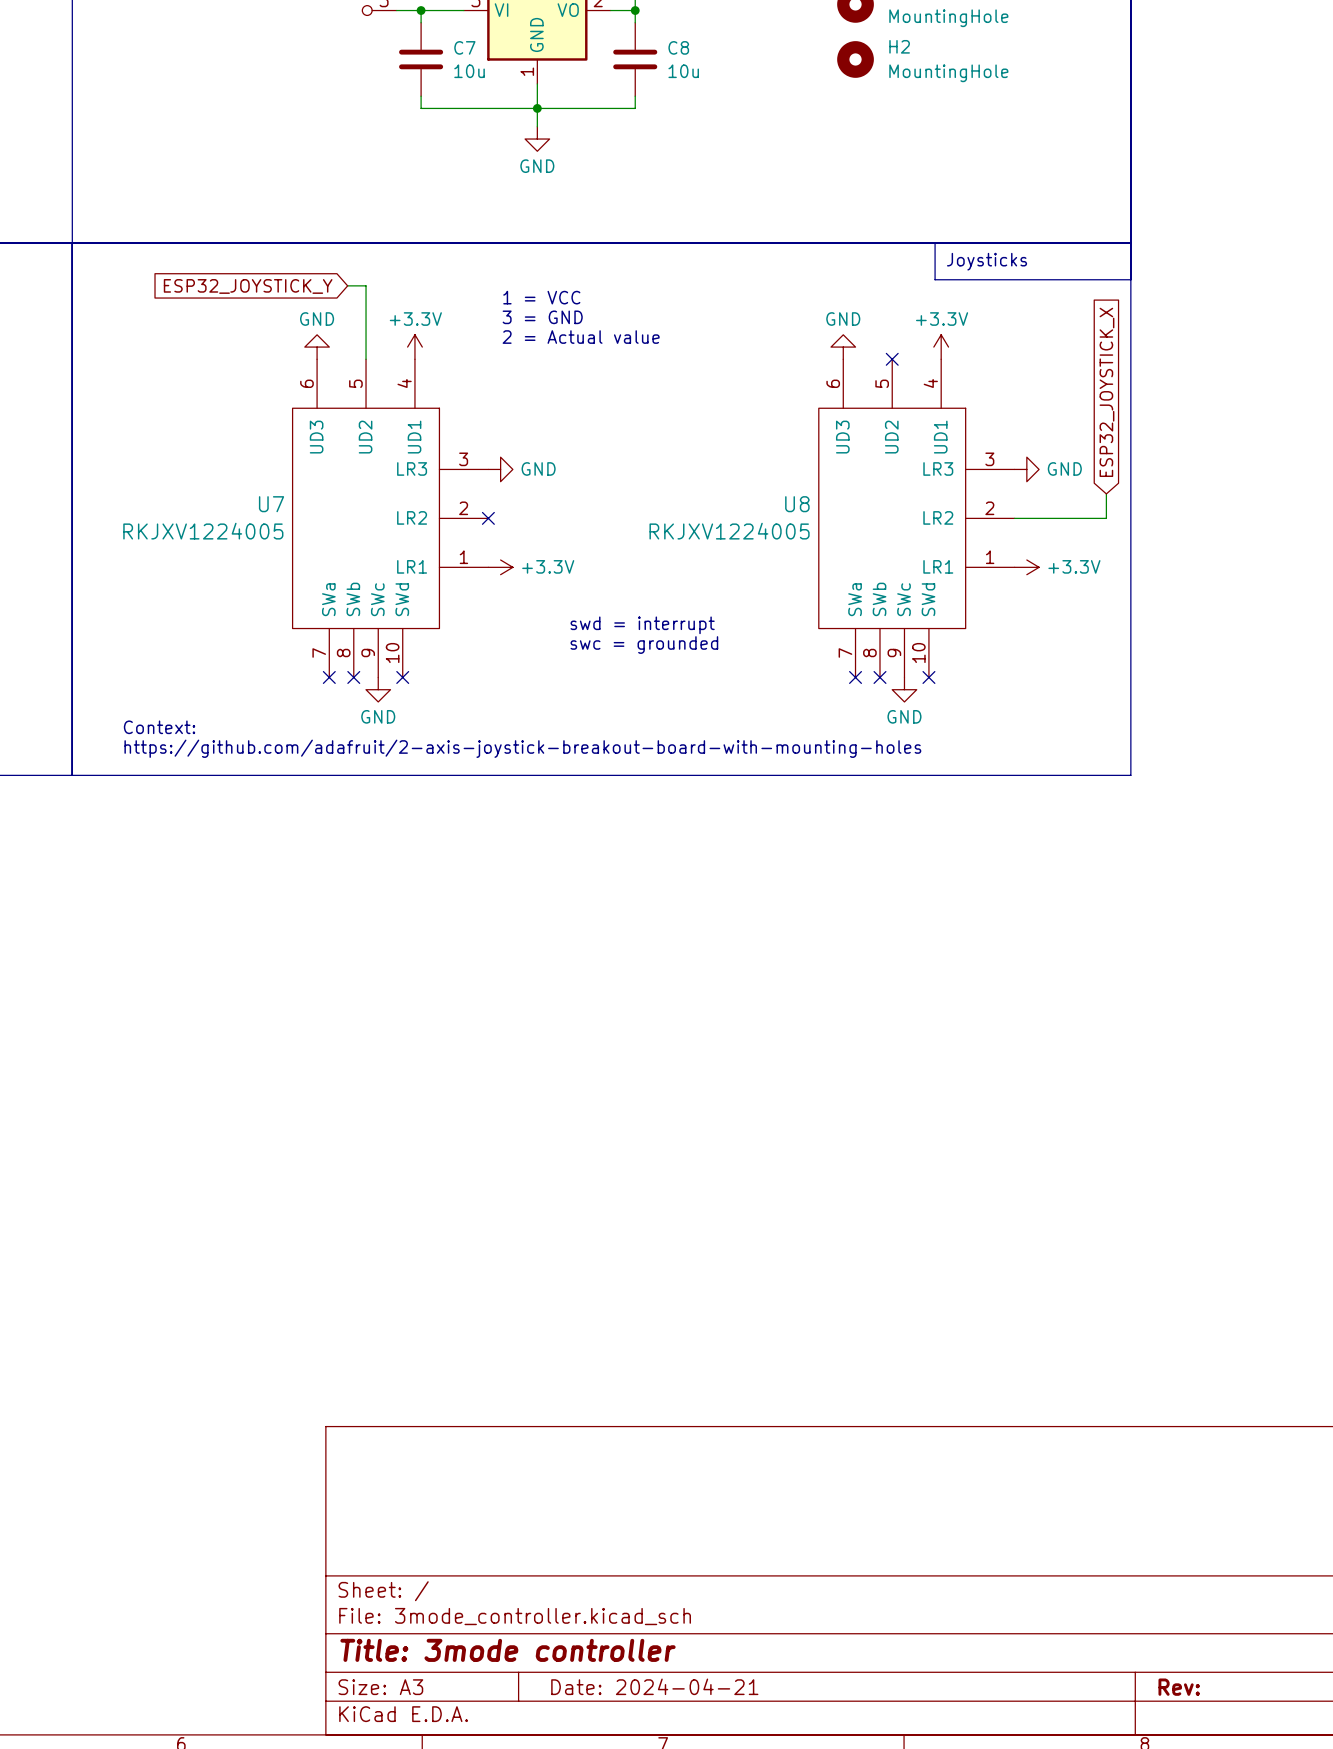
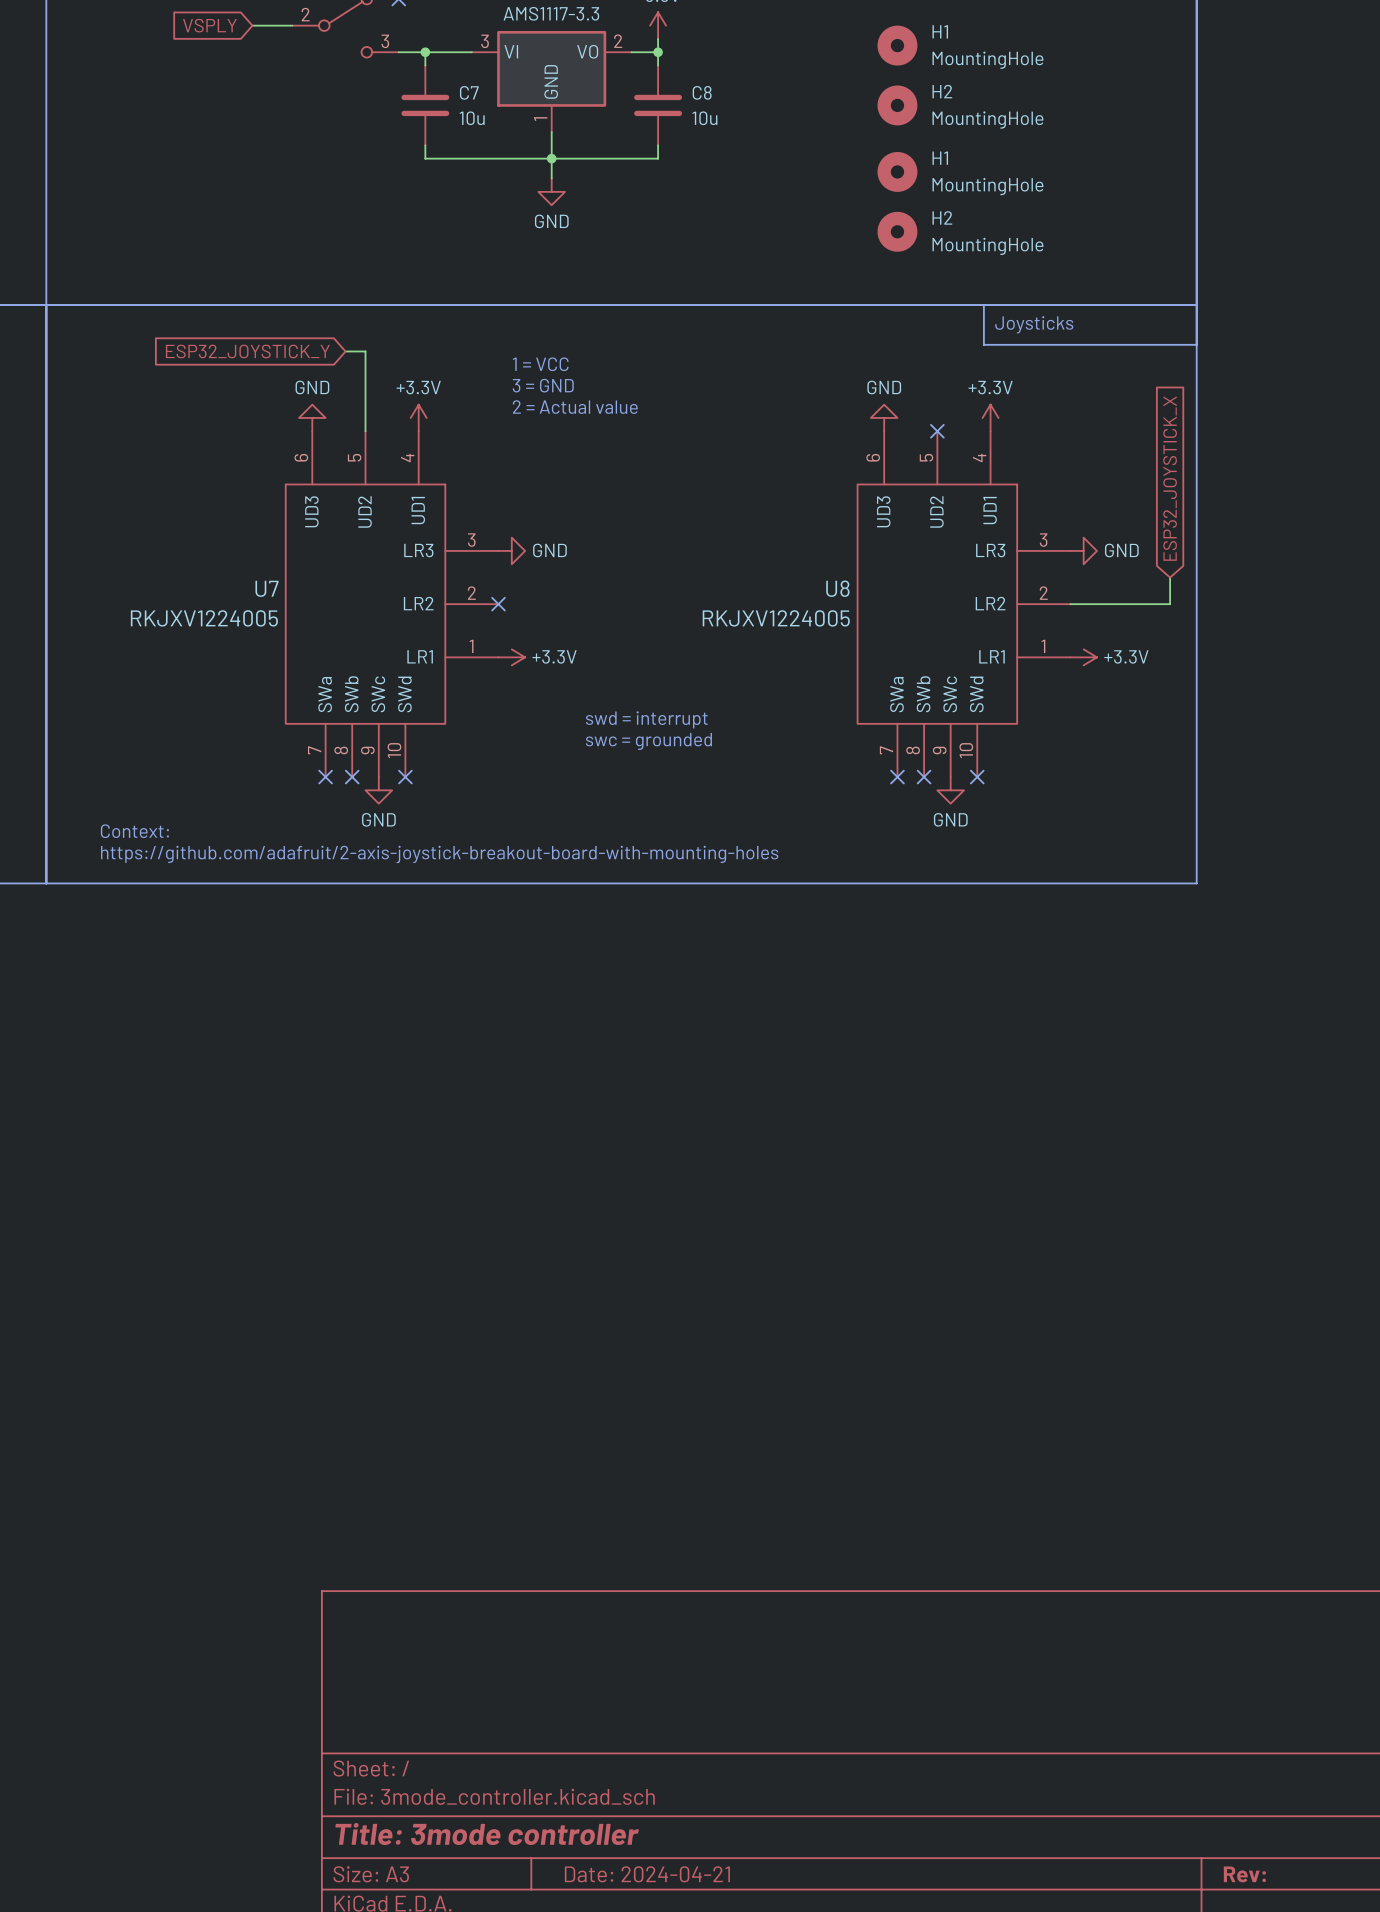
H1: none -> MountingHole (897, 171)
H2: none -> MountingHole (897, 231)

